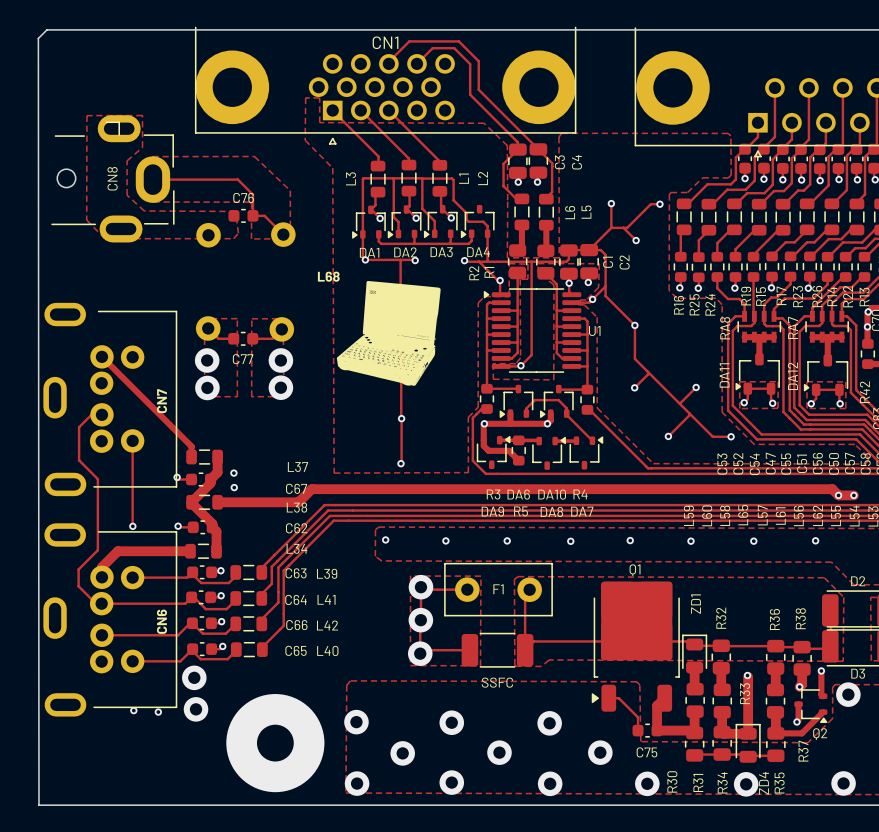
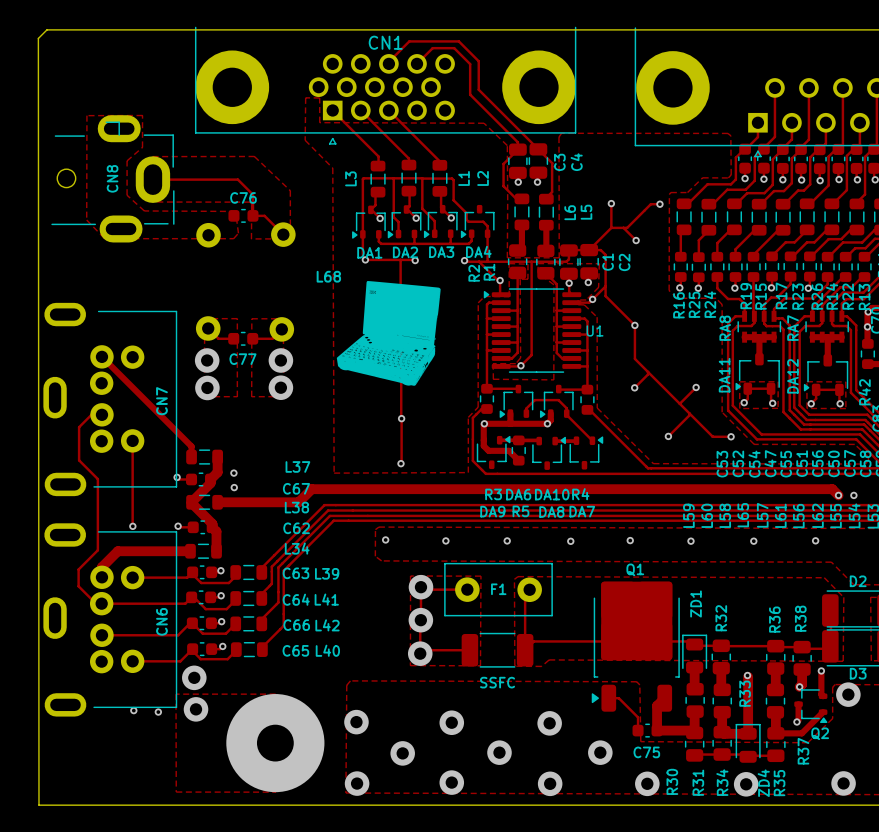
track: (838, 495) (853, 495) -> none
zone outline: none -> (176, 694) (275, 694) (276, 792) (176, 792) (176, 694)

